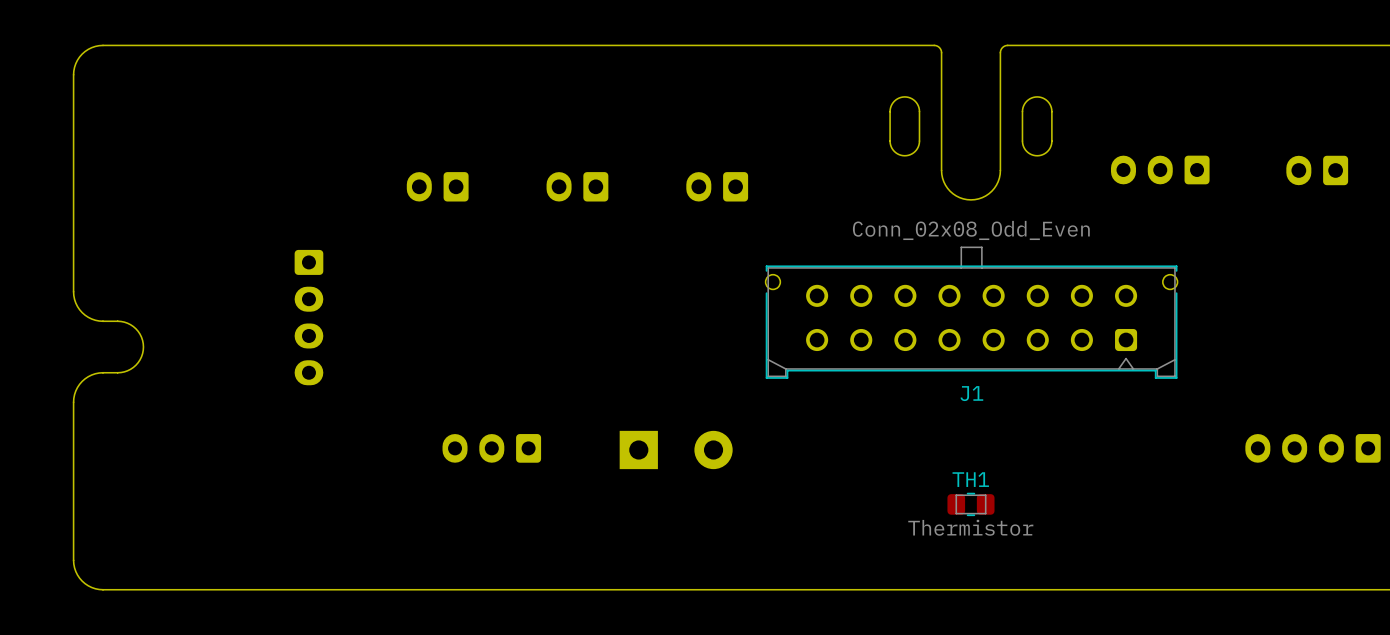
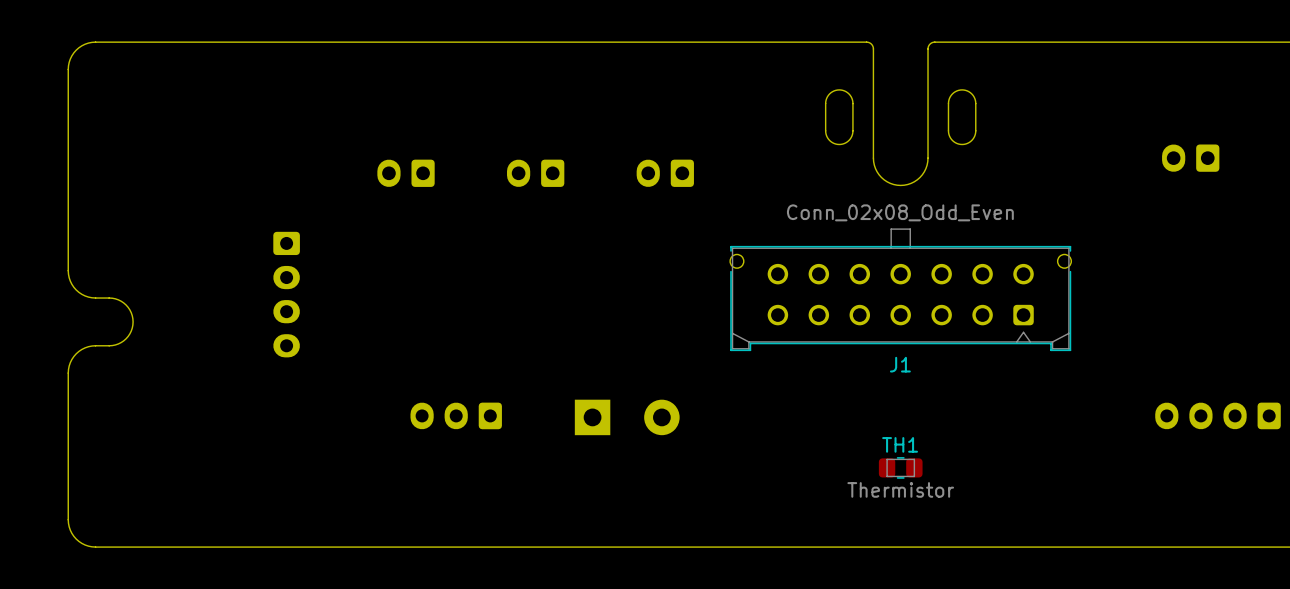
part: (1160, 169) -> none
part position: (1317, 170) -> (1190, 158)
J1 footprint: [765, 246, 1178, 379] -> [730, 228, 1072, 352]

